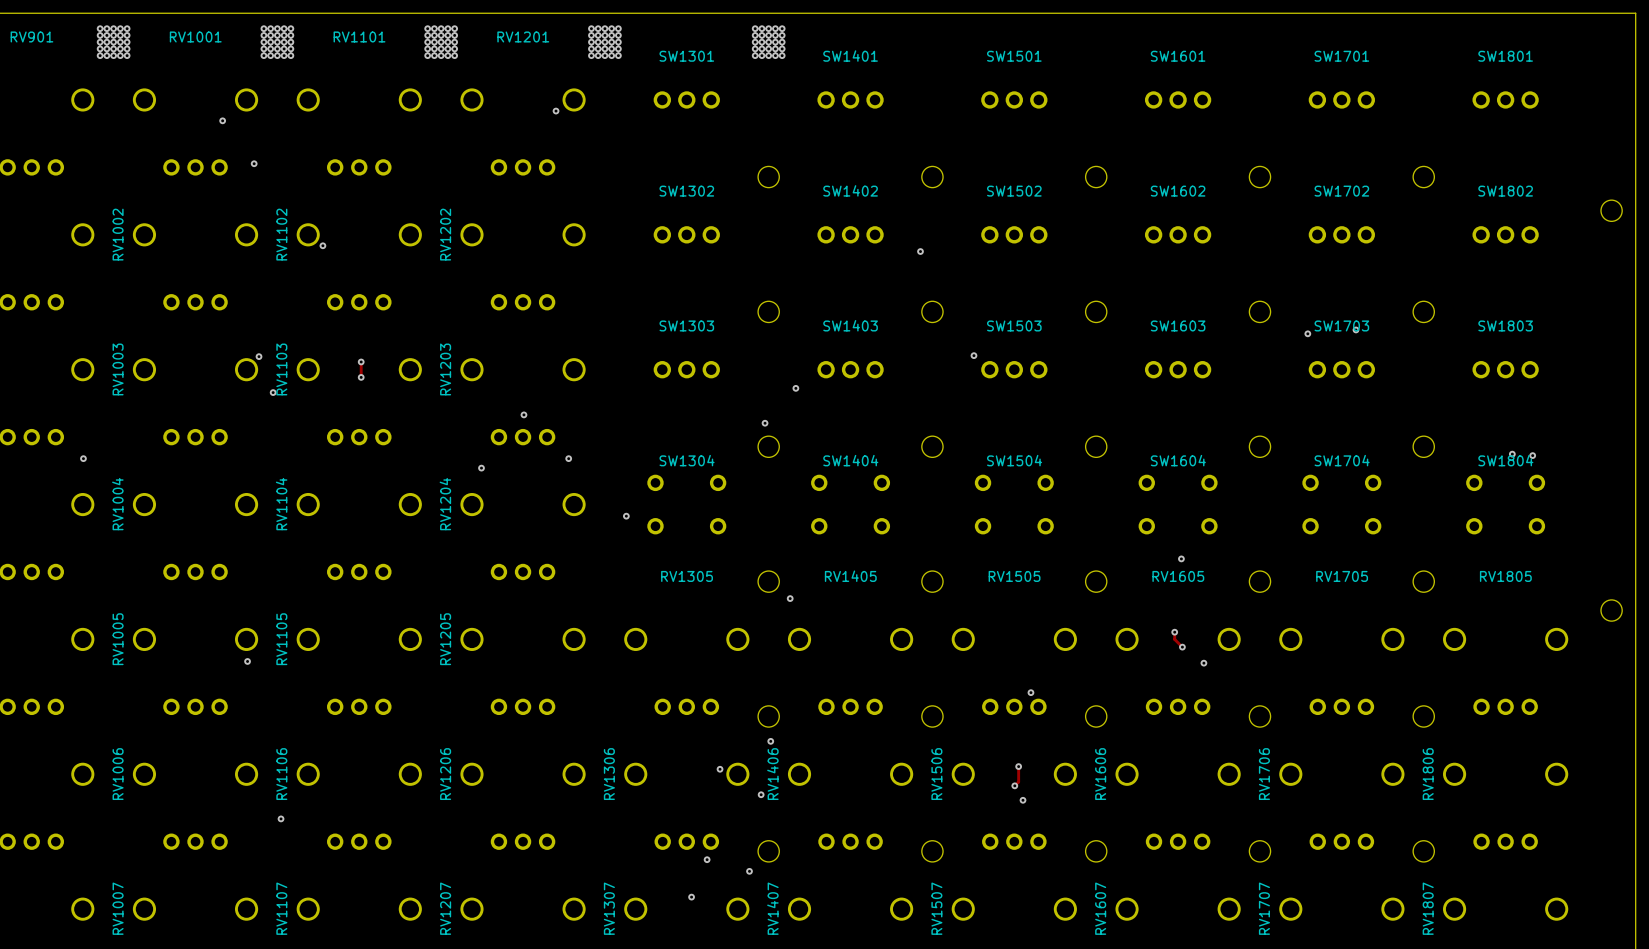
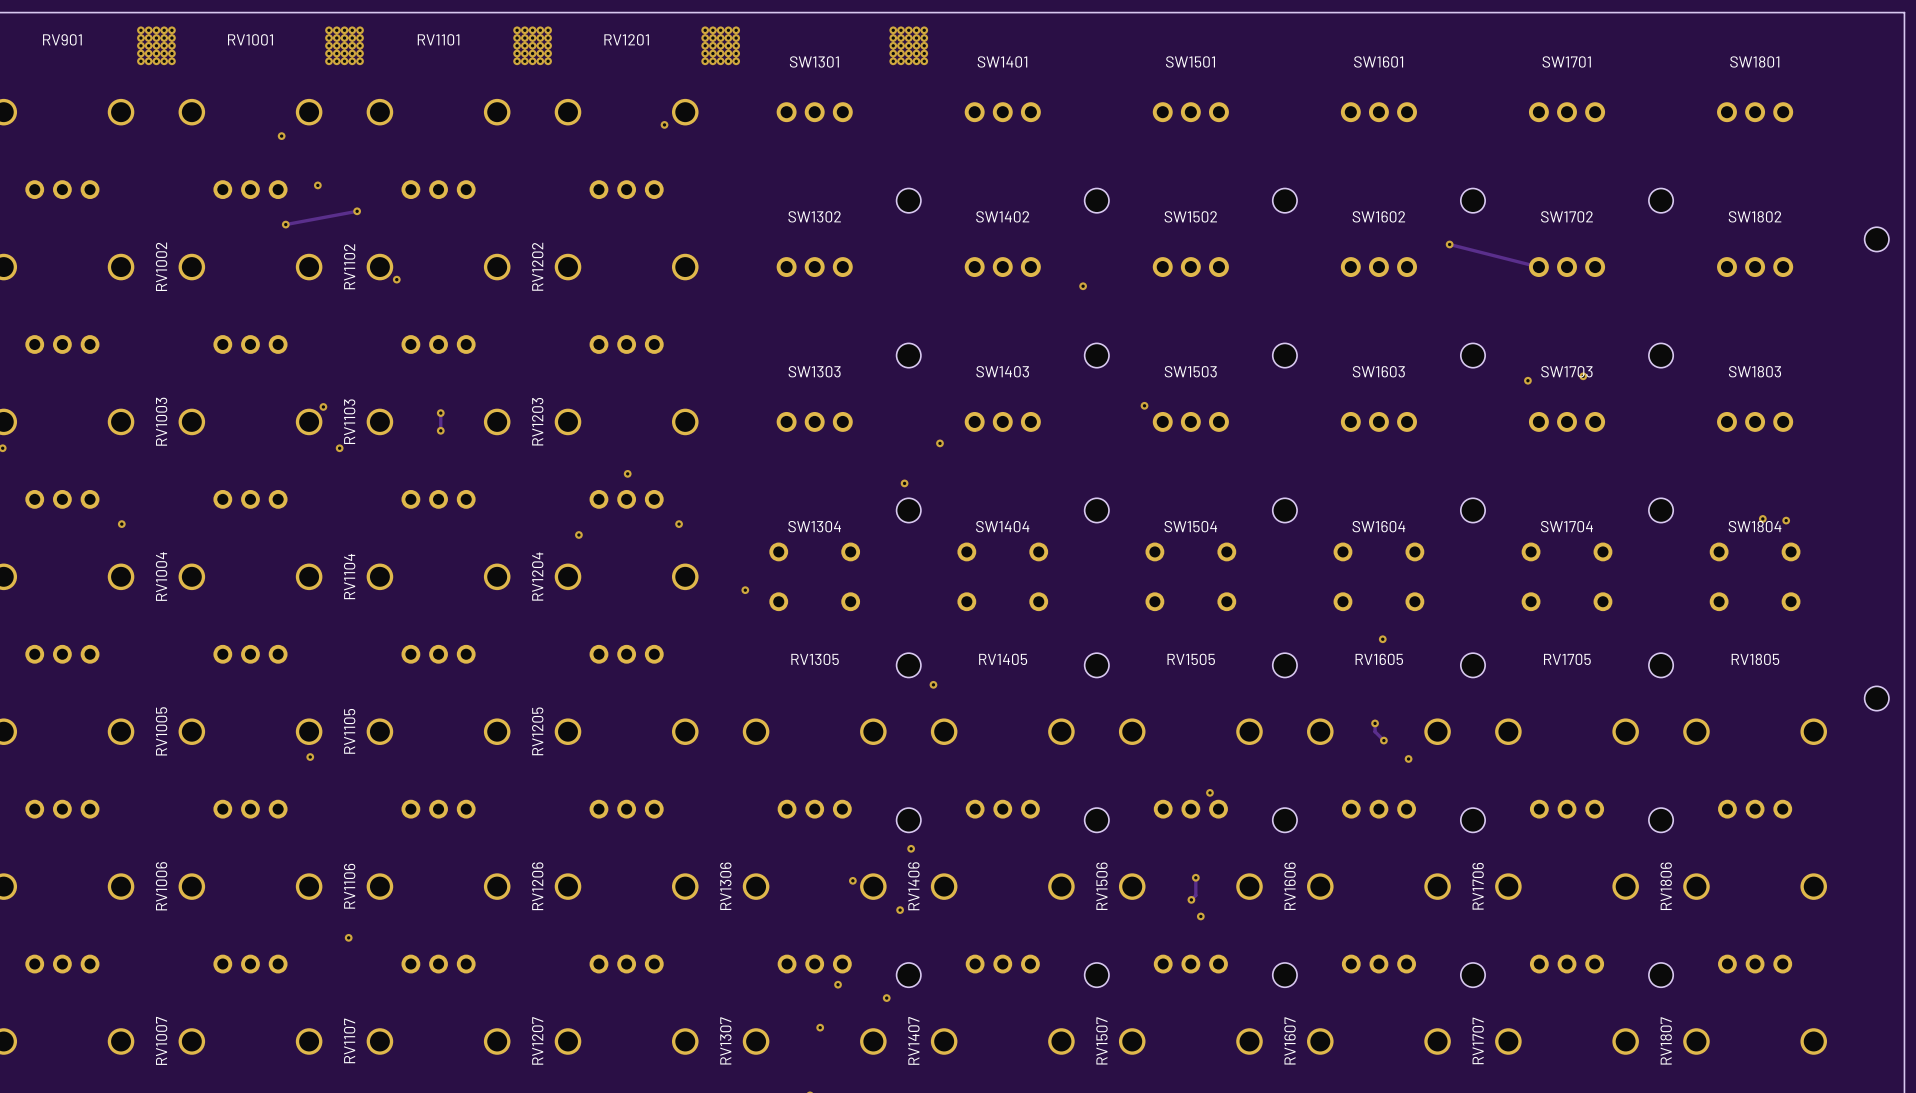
track: none -> (357, 211) (285, 224)
via: none -> (357, 211)
via: none -> (285, 224)
track: none -> (1449, 244) (1538, 267)
via: none -> (1449, 244)

